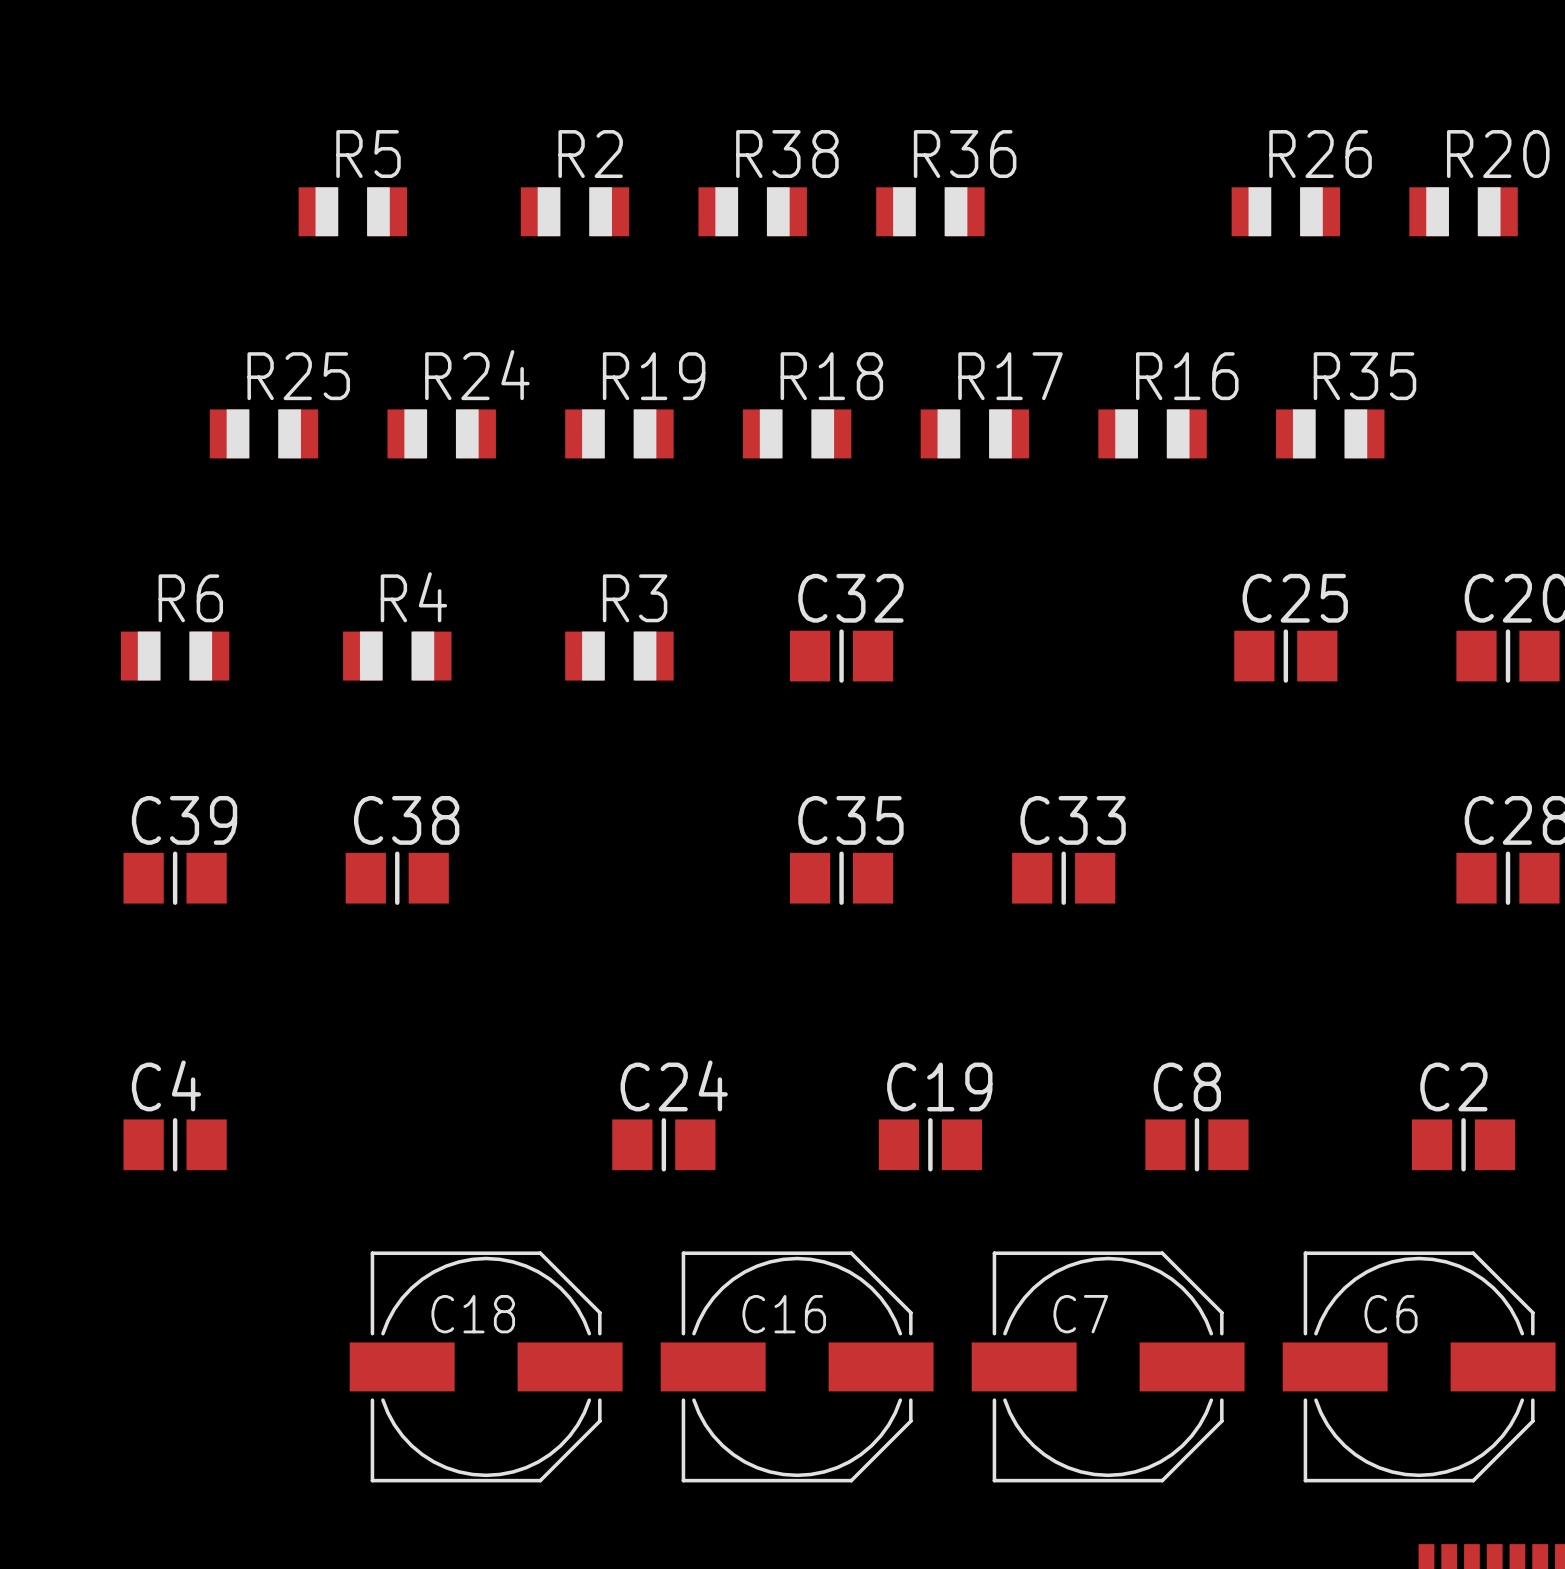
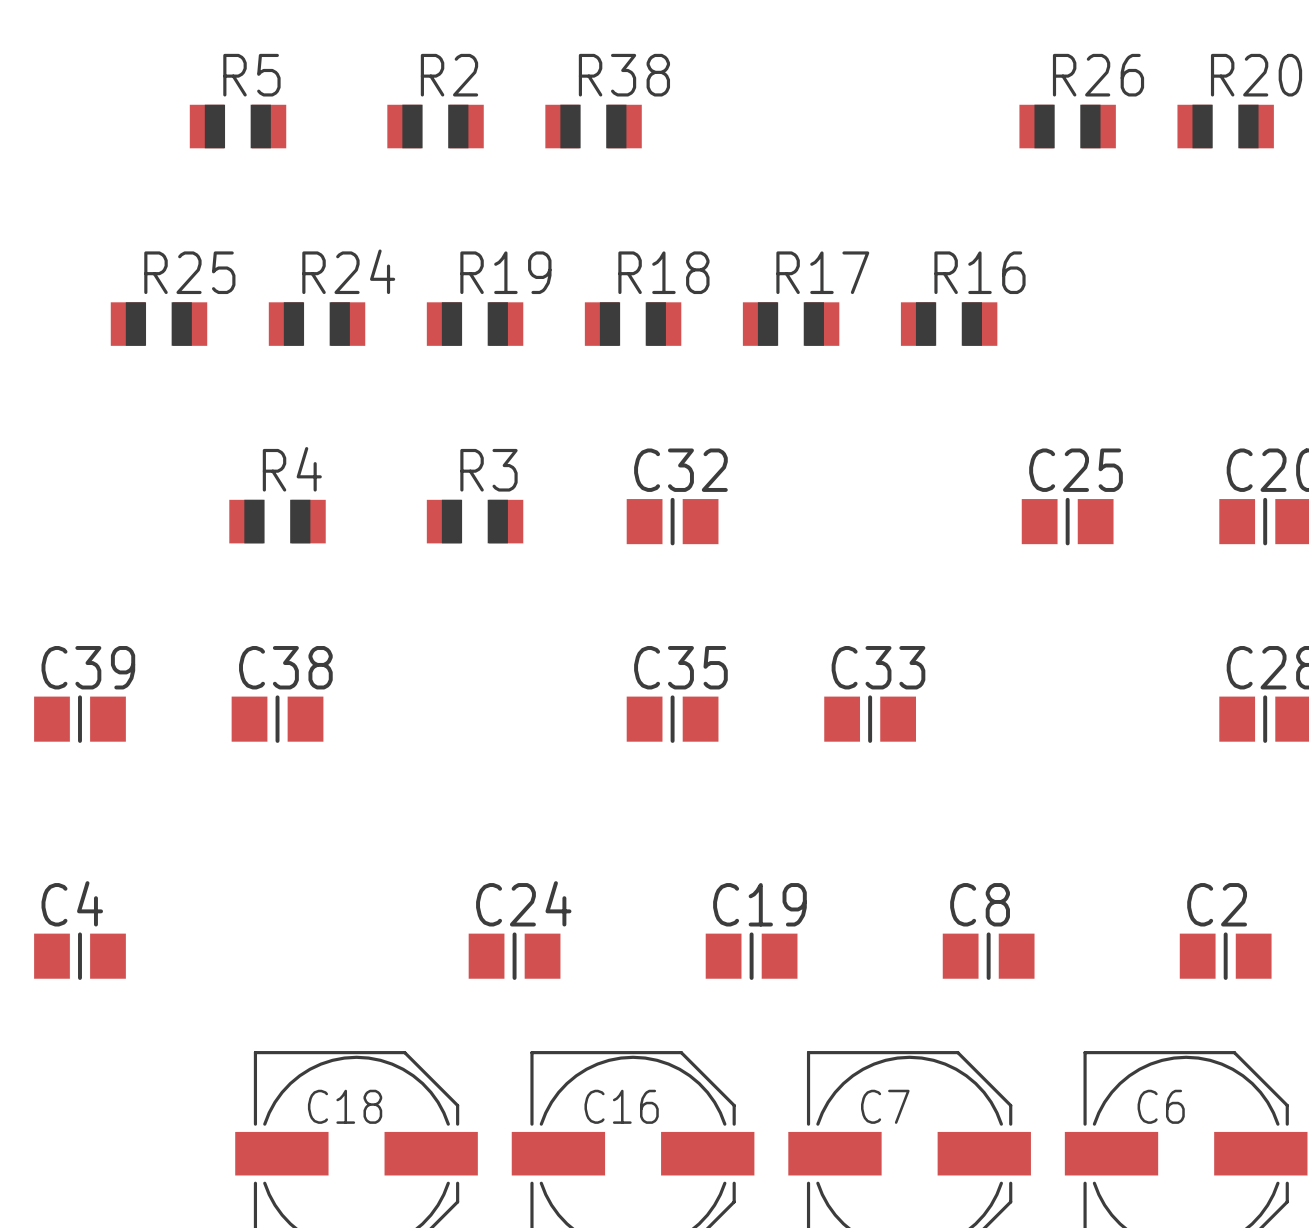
R36: (930, 211) -> none
R35: (1330, 433) -> none
R6: (175, 656) -> none

